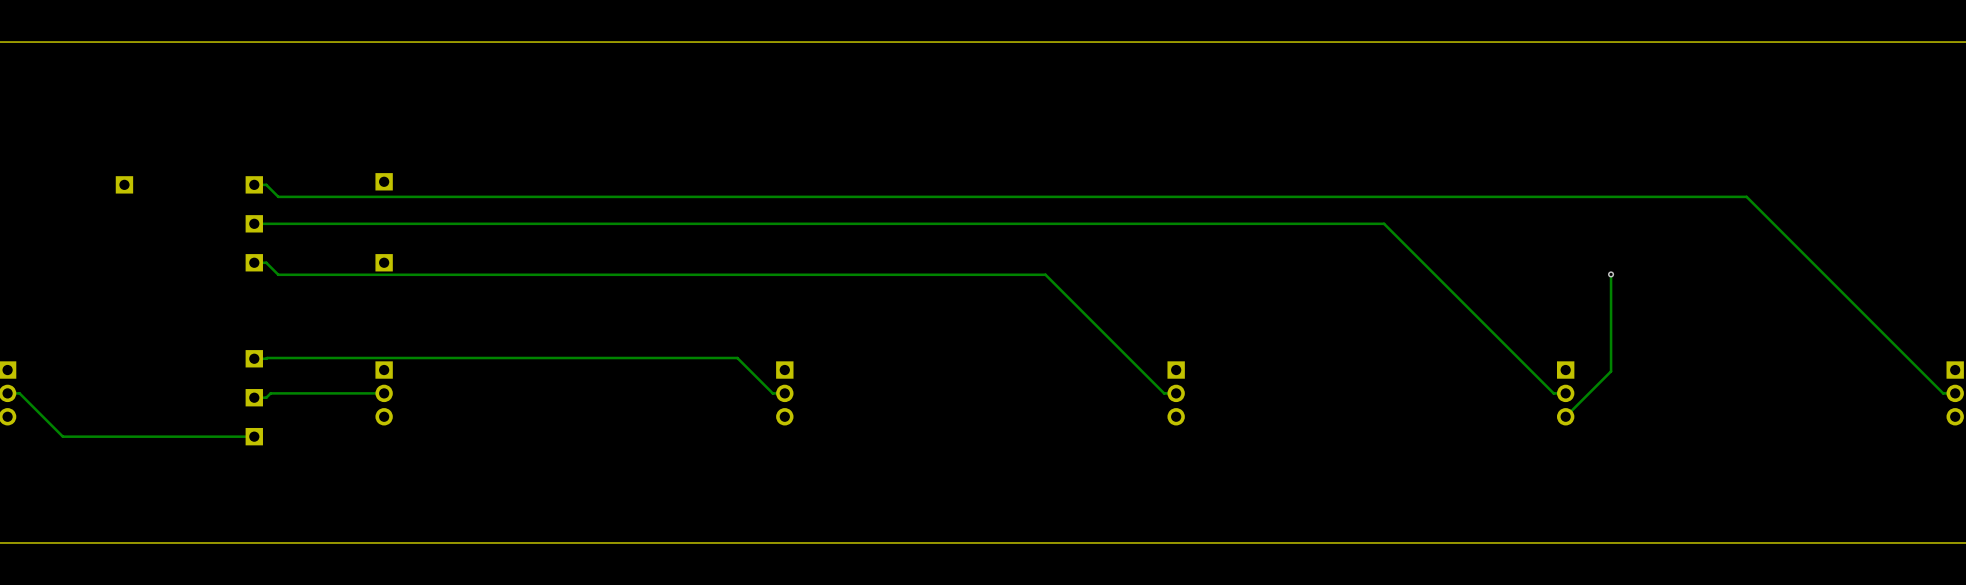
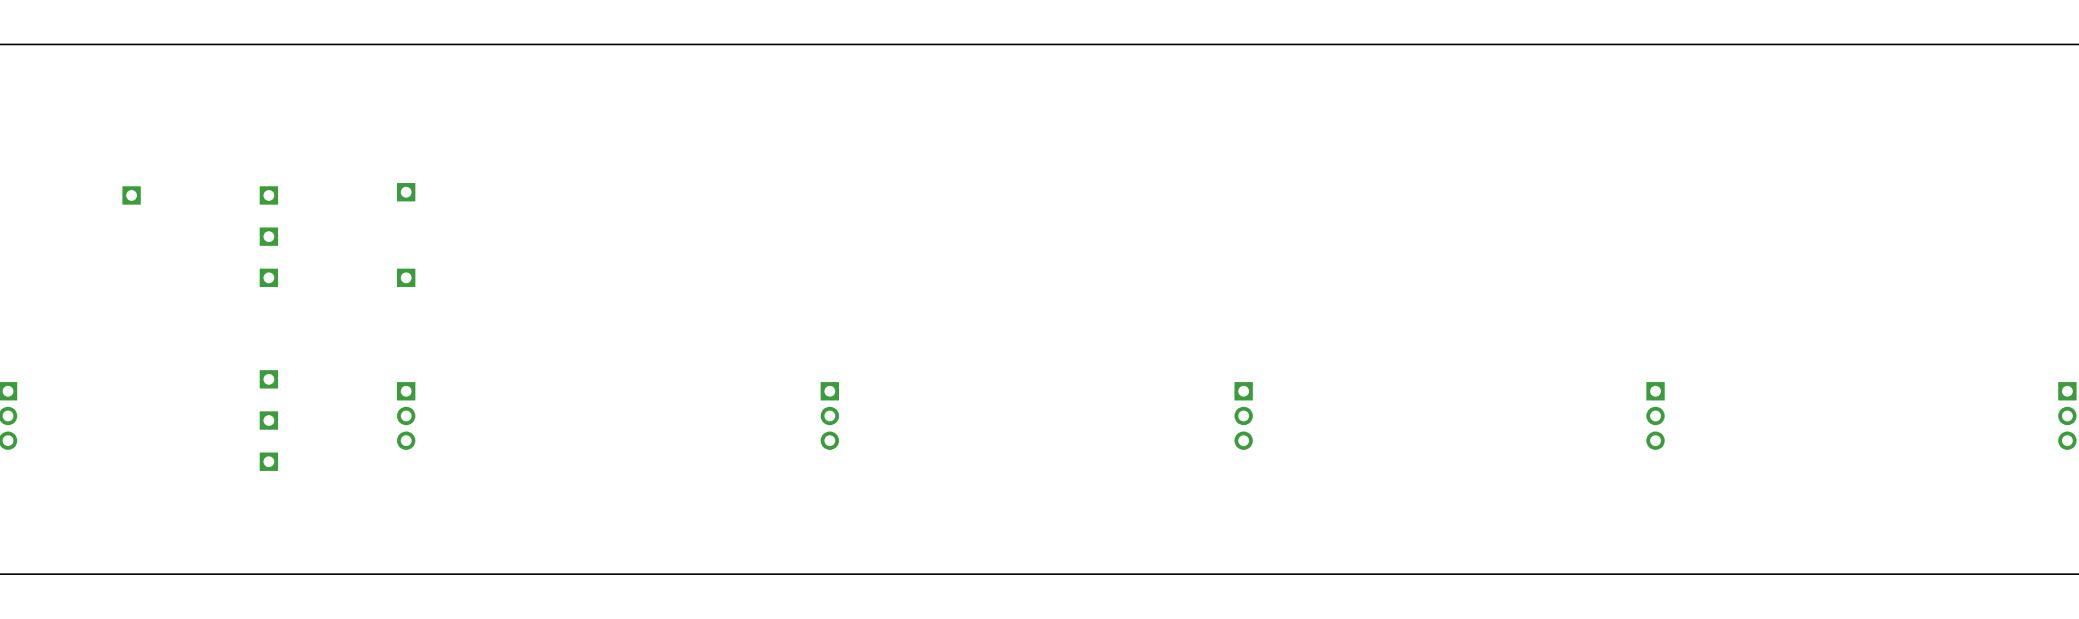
track: (254, 184) (266, 184) (278, 196) (1746, 196) (1943, 393) (1955, 393) -> none
track: (254, 223) (1384, 223) (1553, 393) (1565, 393) -> none
track: (254, 262) (266, 262) (278, 274) (1045, 274) (1164, 393) (1176, 393) -> none
track: (1611, 274) (1611, 371) (1565, 416) -> none
via: (1611, 274) -> none
track: (254, 358) (737, 358) (772, 393) (784, 393) -> none
track: (7, 393) (19, 393) (62, 436) (254, 436) -> none
track: (384, 393) (270, 393) (266, 397) (254, 397) -> none

